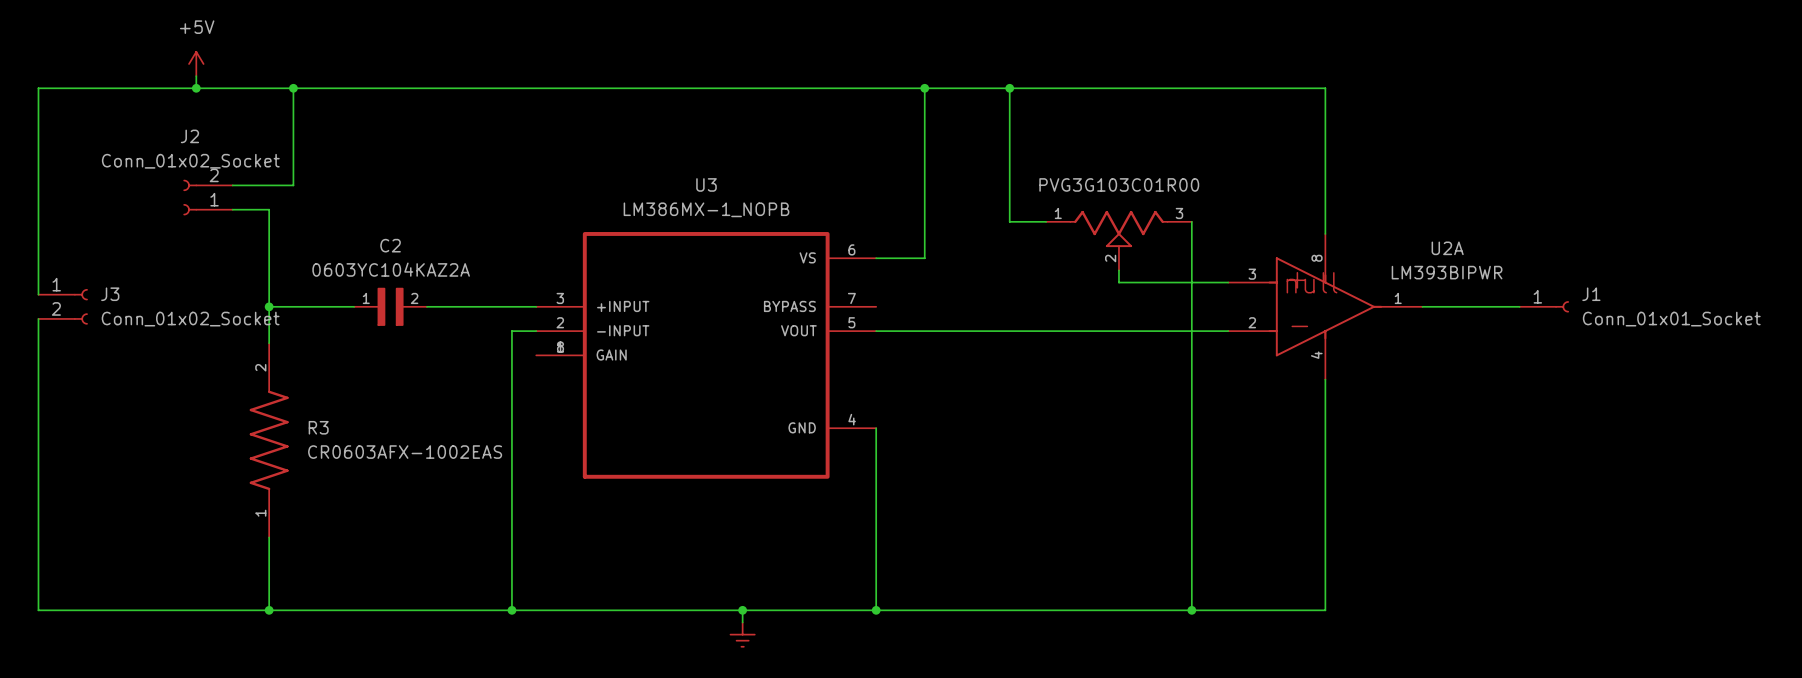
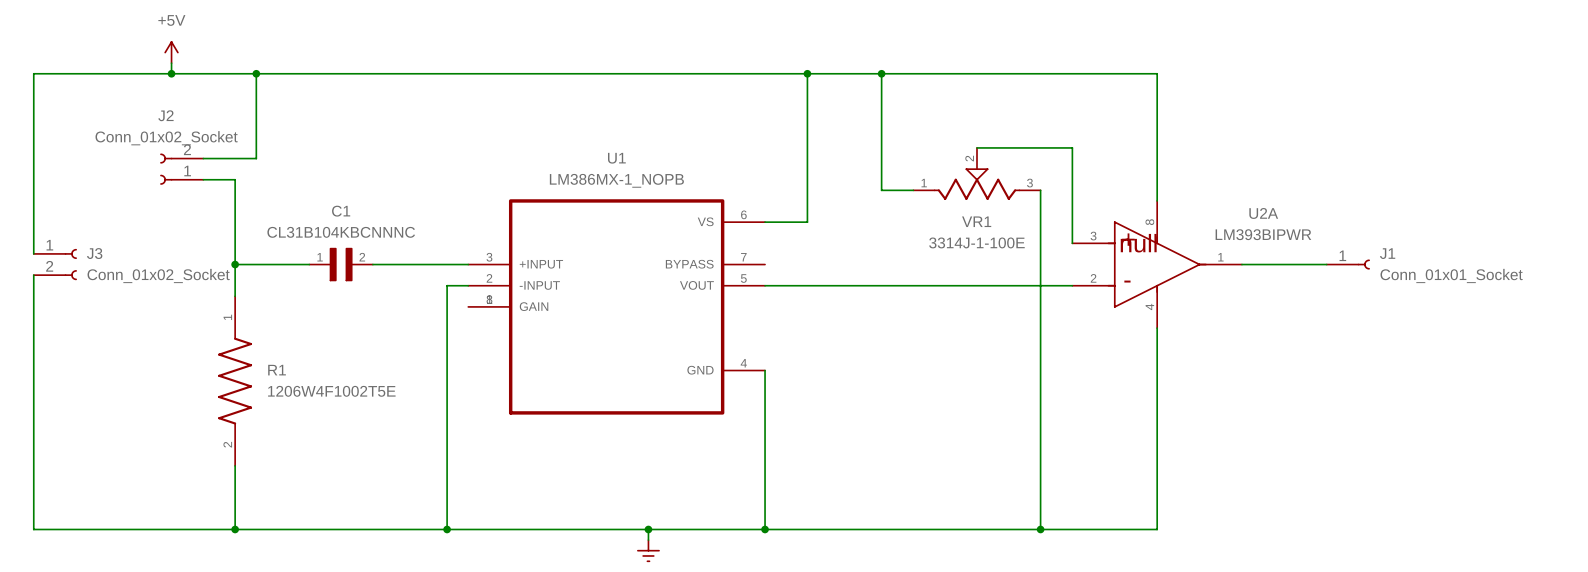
U3 name: U3 (706, 184) -> U1 (616, 158)
VR1: none -> 3314J-1-100E (977, 173)
part: PVG3G103C01R00 (1118, 240) -> none
C2 name: C2 (390, 245) -> C1 (341, 211)
C2 value: 0603YC104KAZ2A (391, 269) -> CL31B104KBCNNNC (341, 232)
wire: (1118, 270) (1118, 282) (1228, 282) -> (977, 147) (1072, 147) (1072, 243)
R3 name: R3 (318, 427) -> R1 (277, 370)
R3 rotation: 0° (269, 440) -> 180° (235, 381)
R3 value: CR0603AFX-1002EAS (405, 452) -> 1206W4F1002T5E (331, 391)

